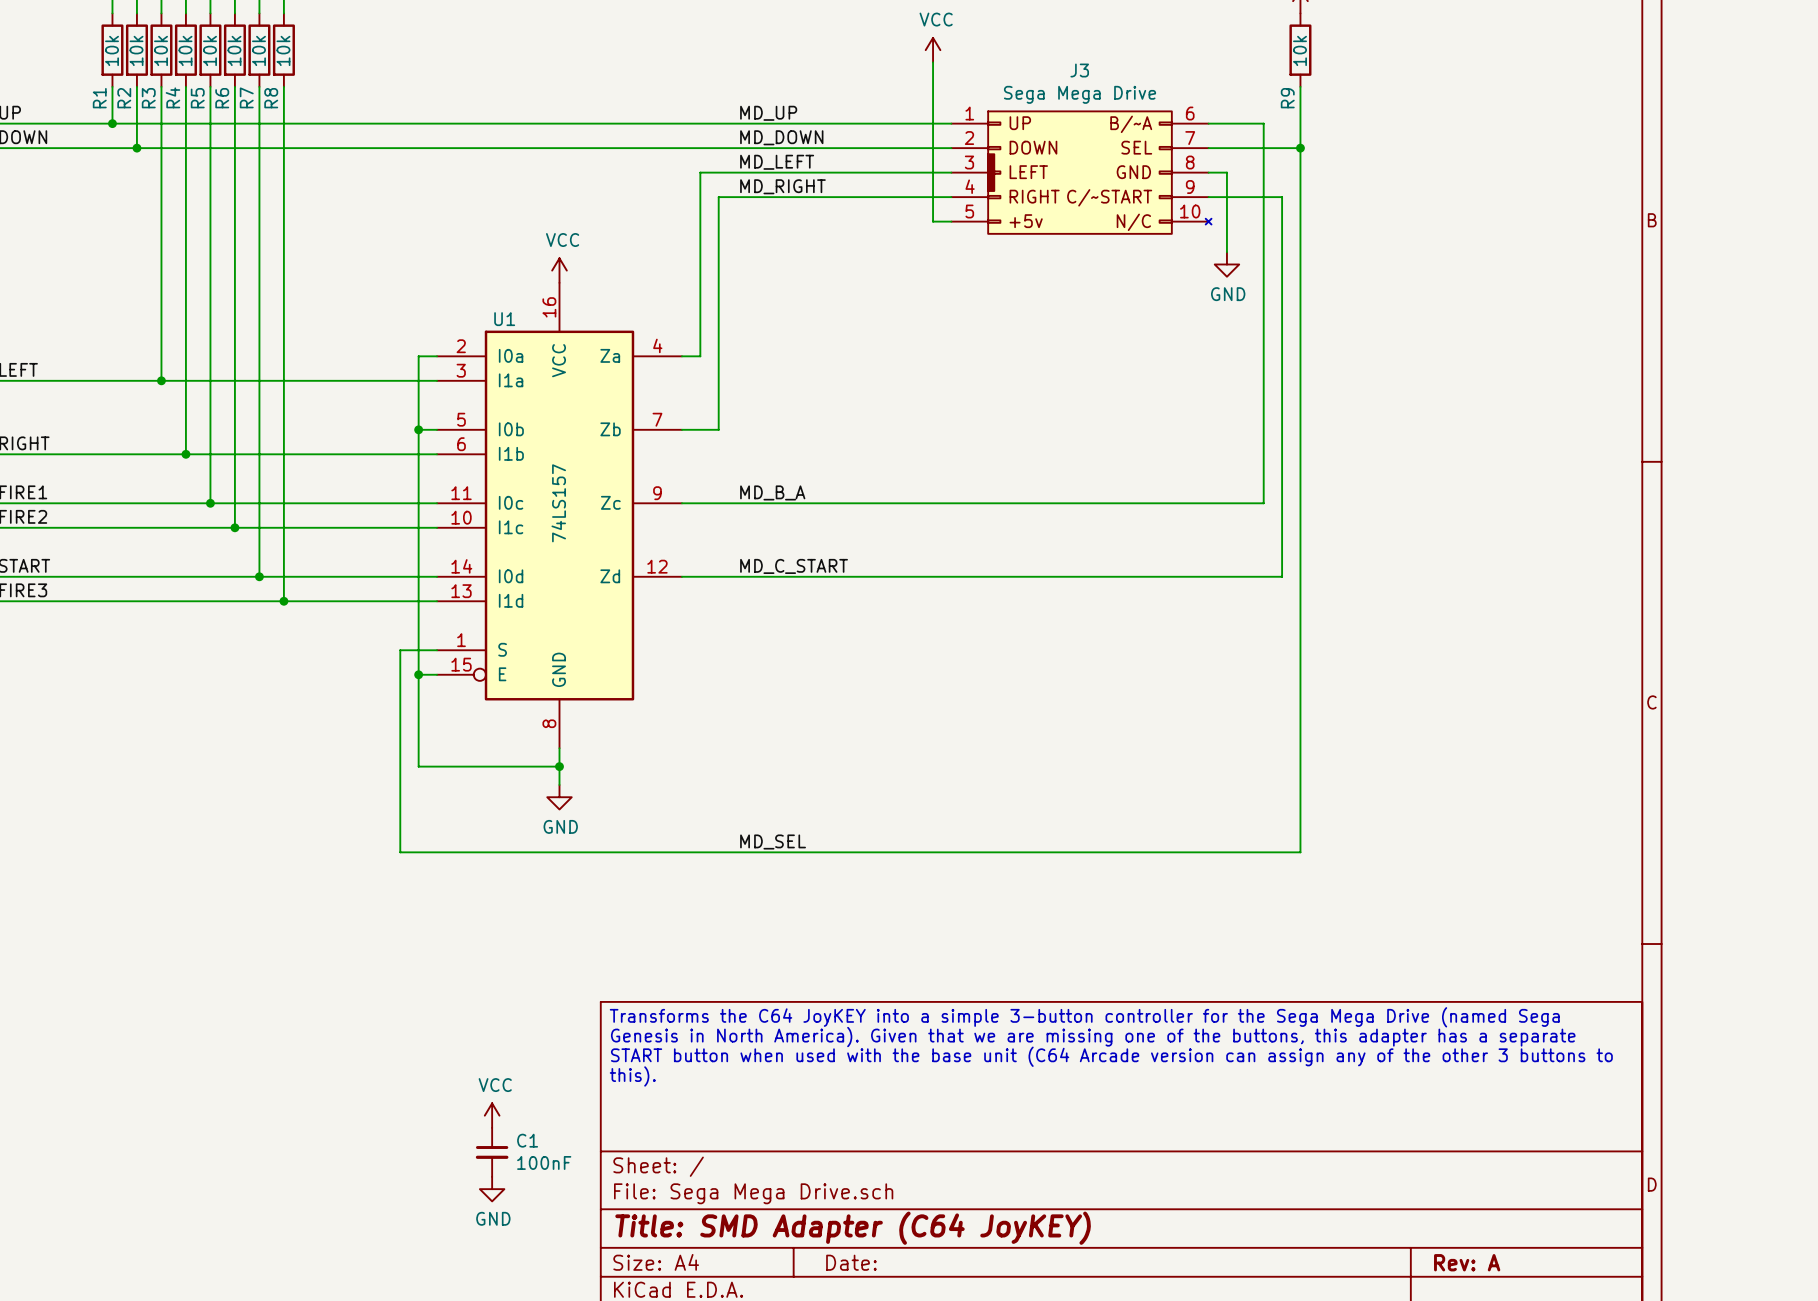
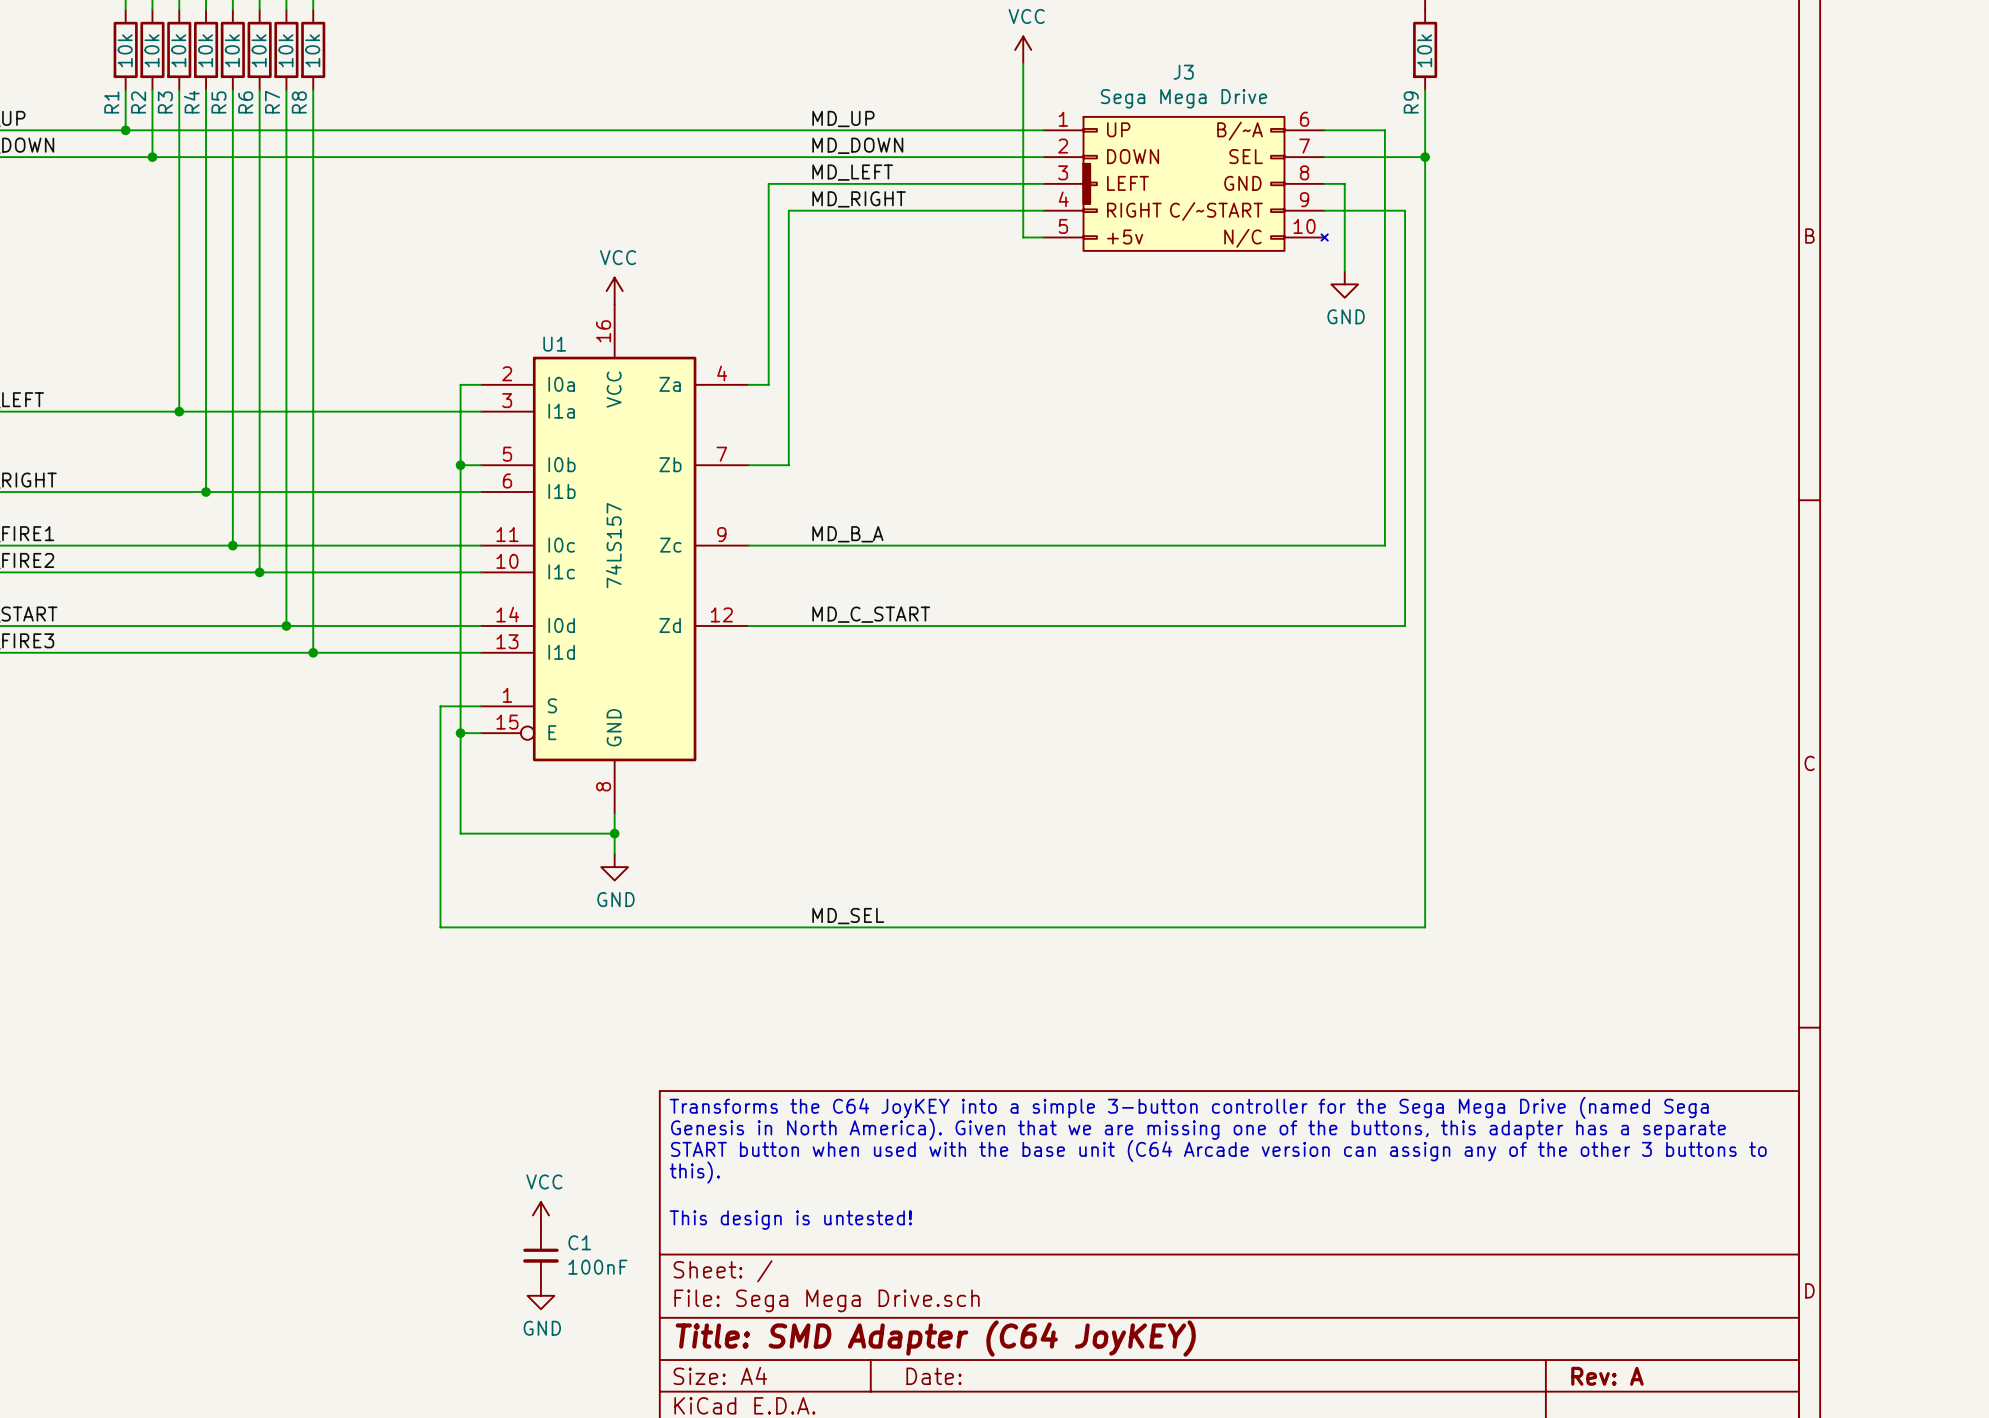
text: none -> This design is untested! (790, 1220)

